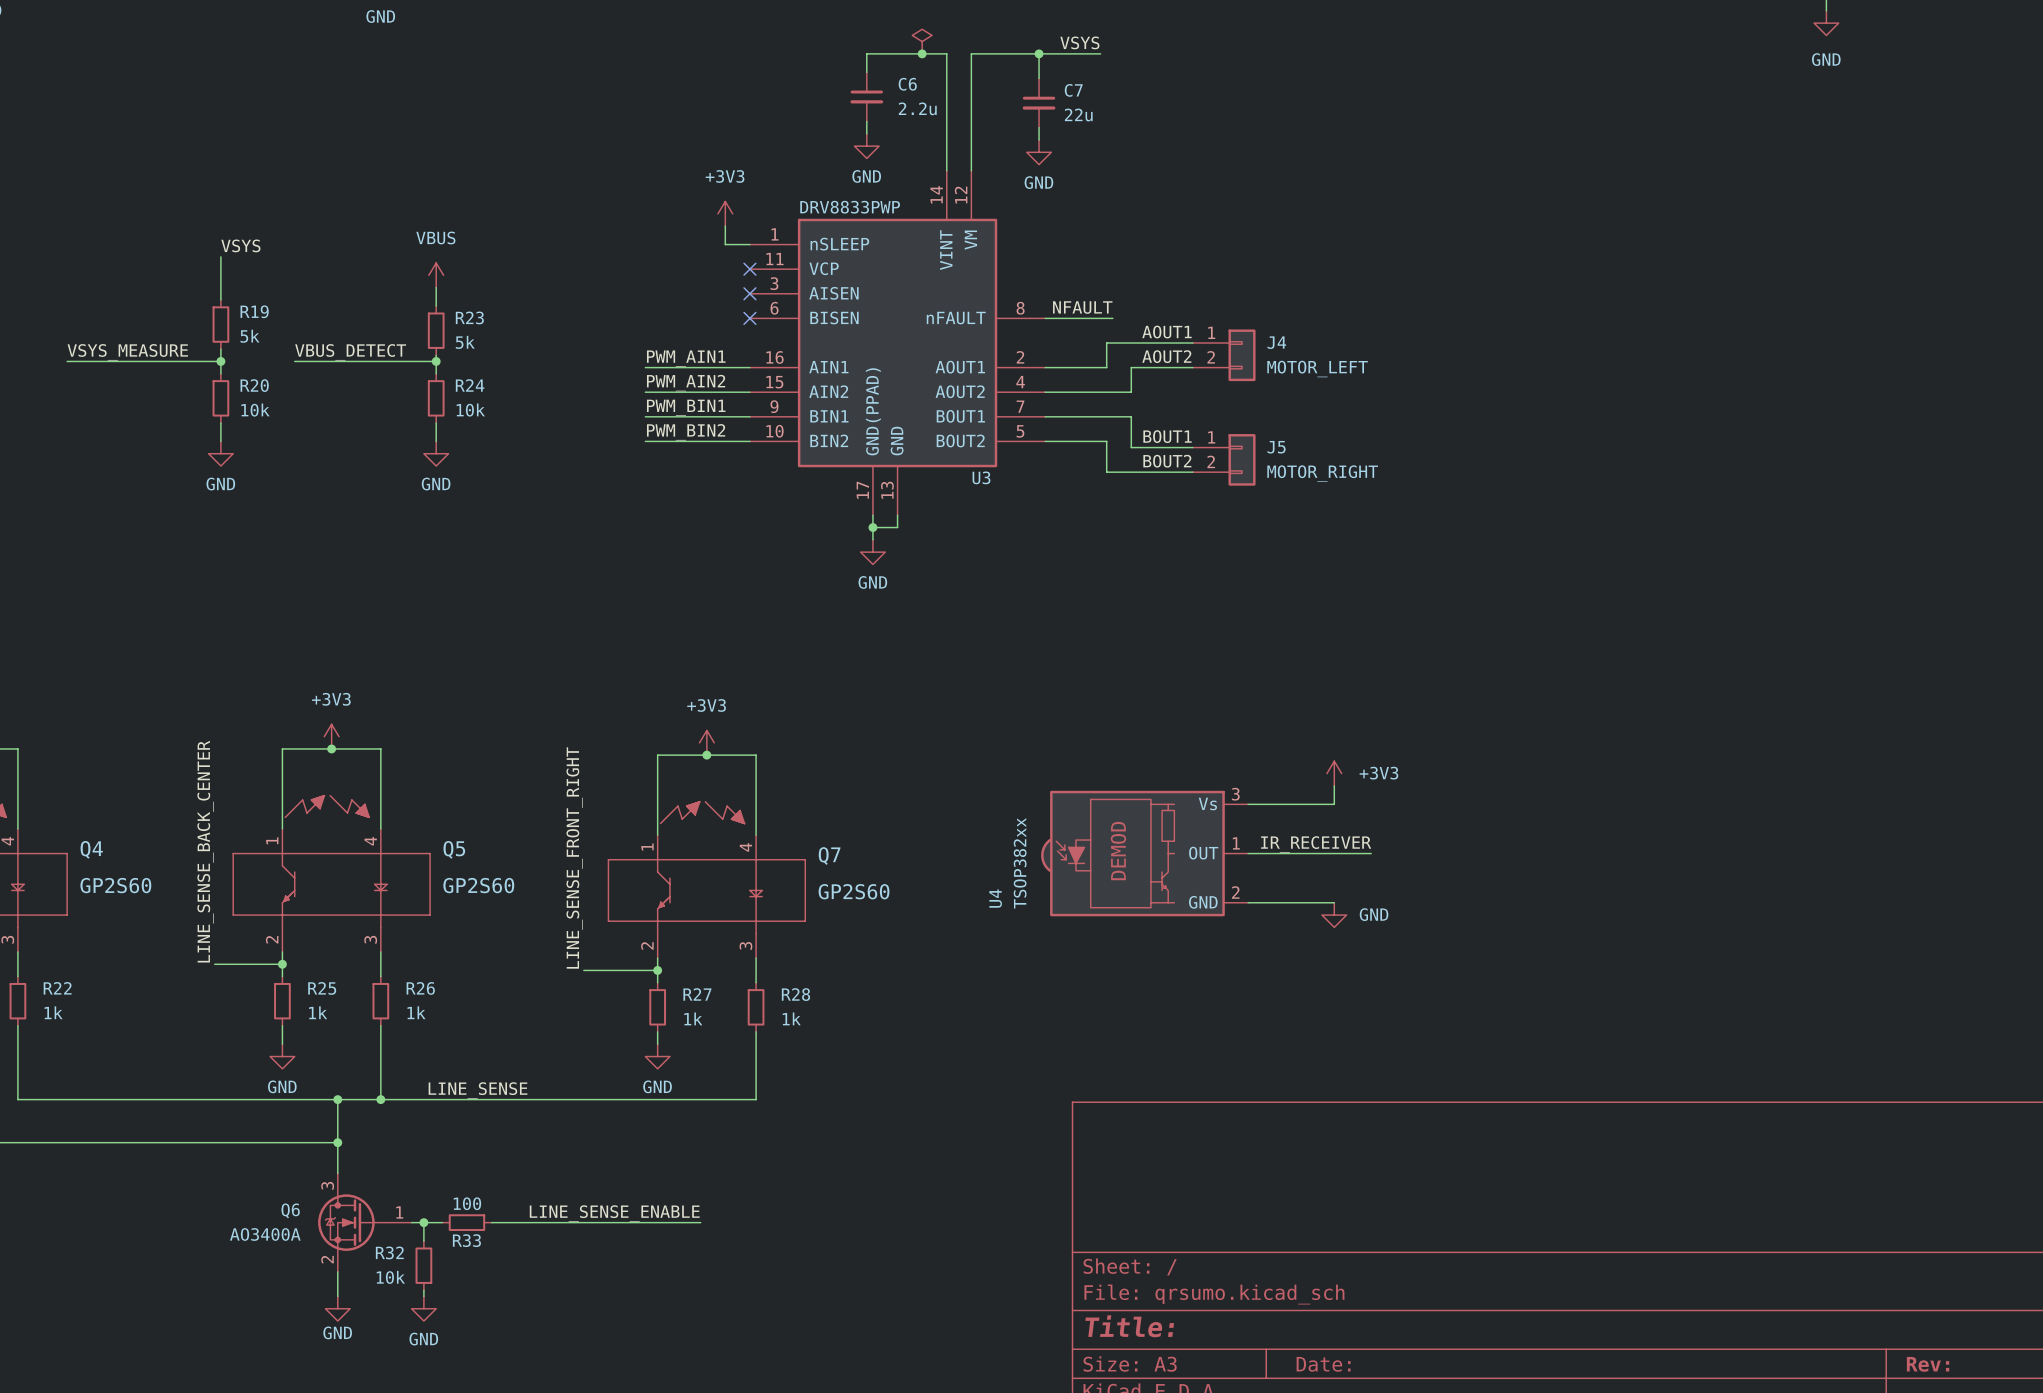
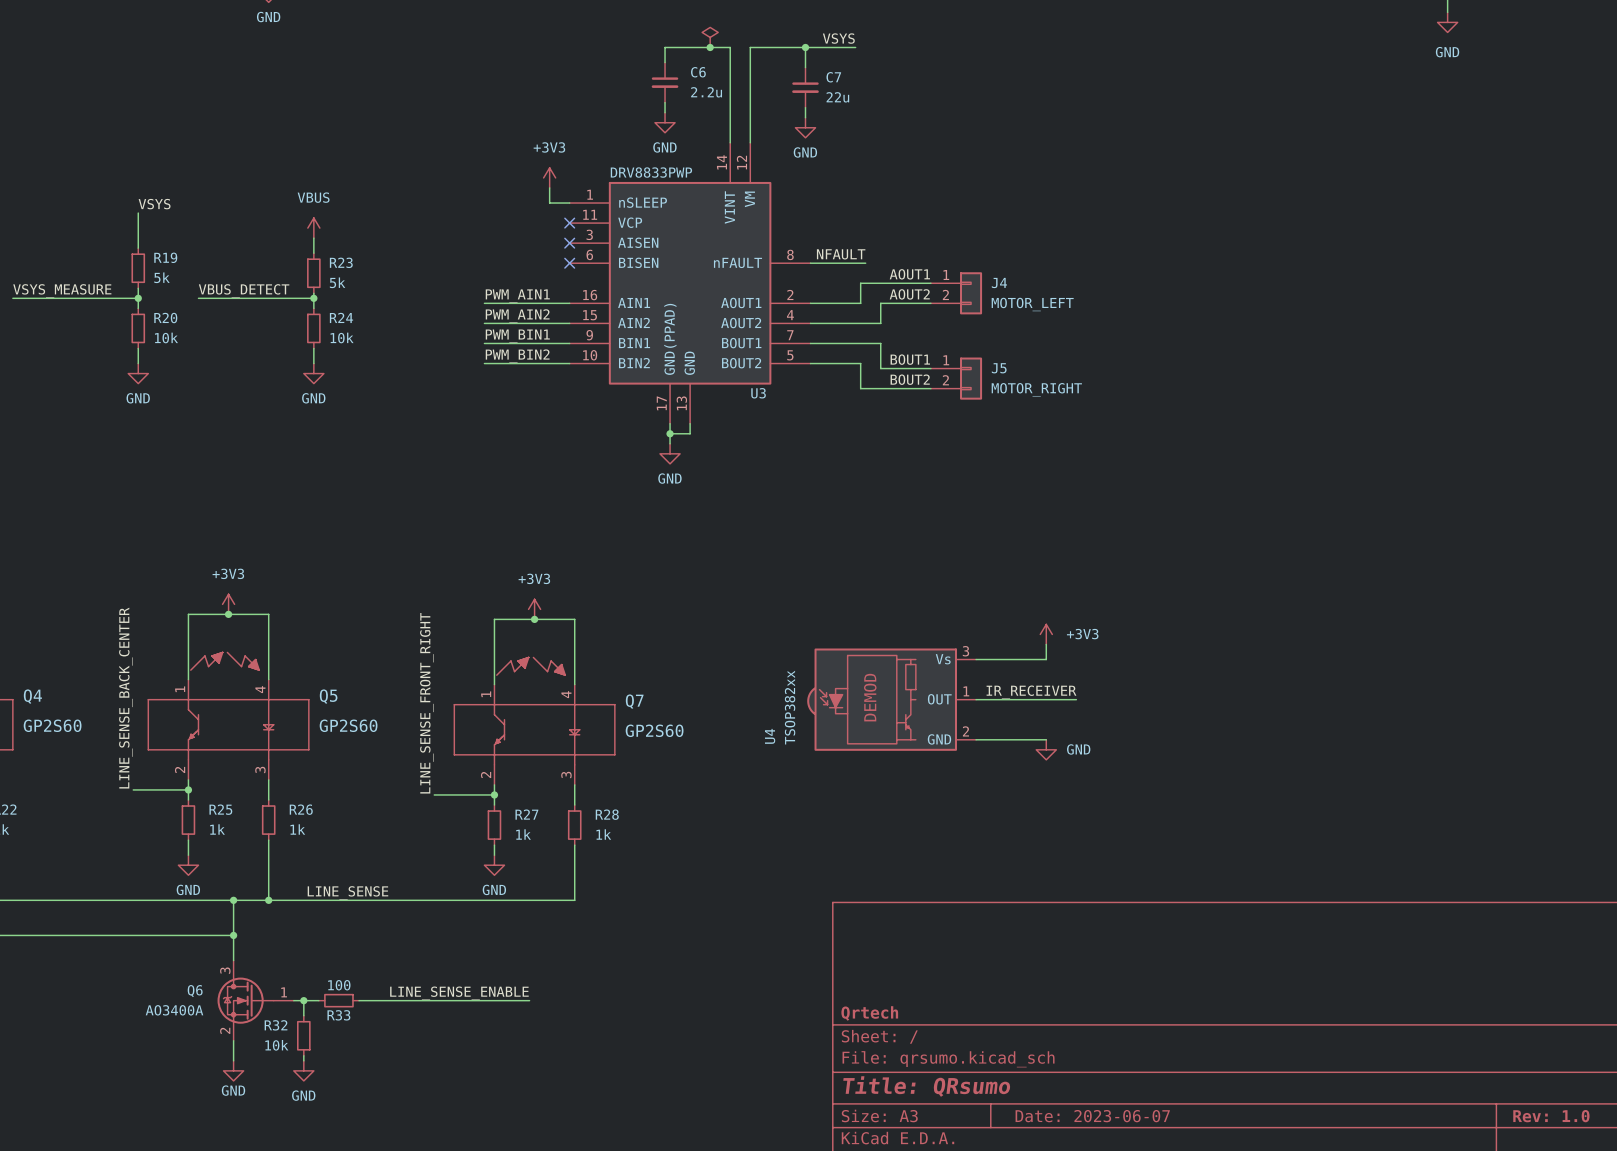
title block: none -> Qrtech (869, 1013)
title block: Title: (1129, 1326) -> Title: QRsumo (926, 1086)
title block: Date: (1323, 1364) -> Date: 2023-06-07 (1092, 1116)
title block: Rev: (1928, 1364) -> Rev: 1.0 (1551, 1116)

